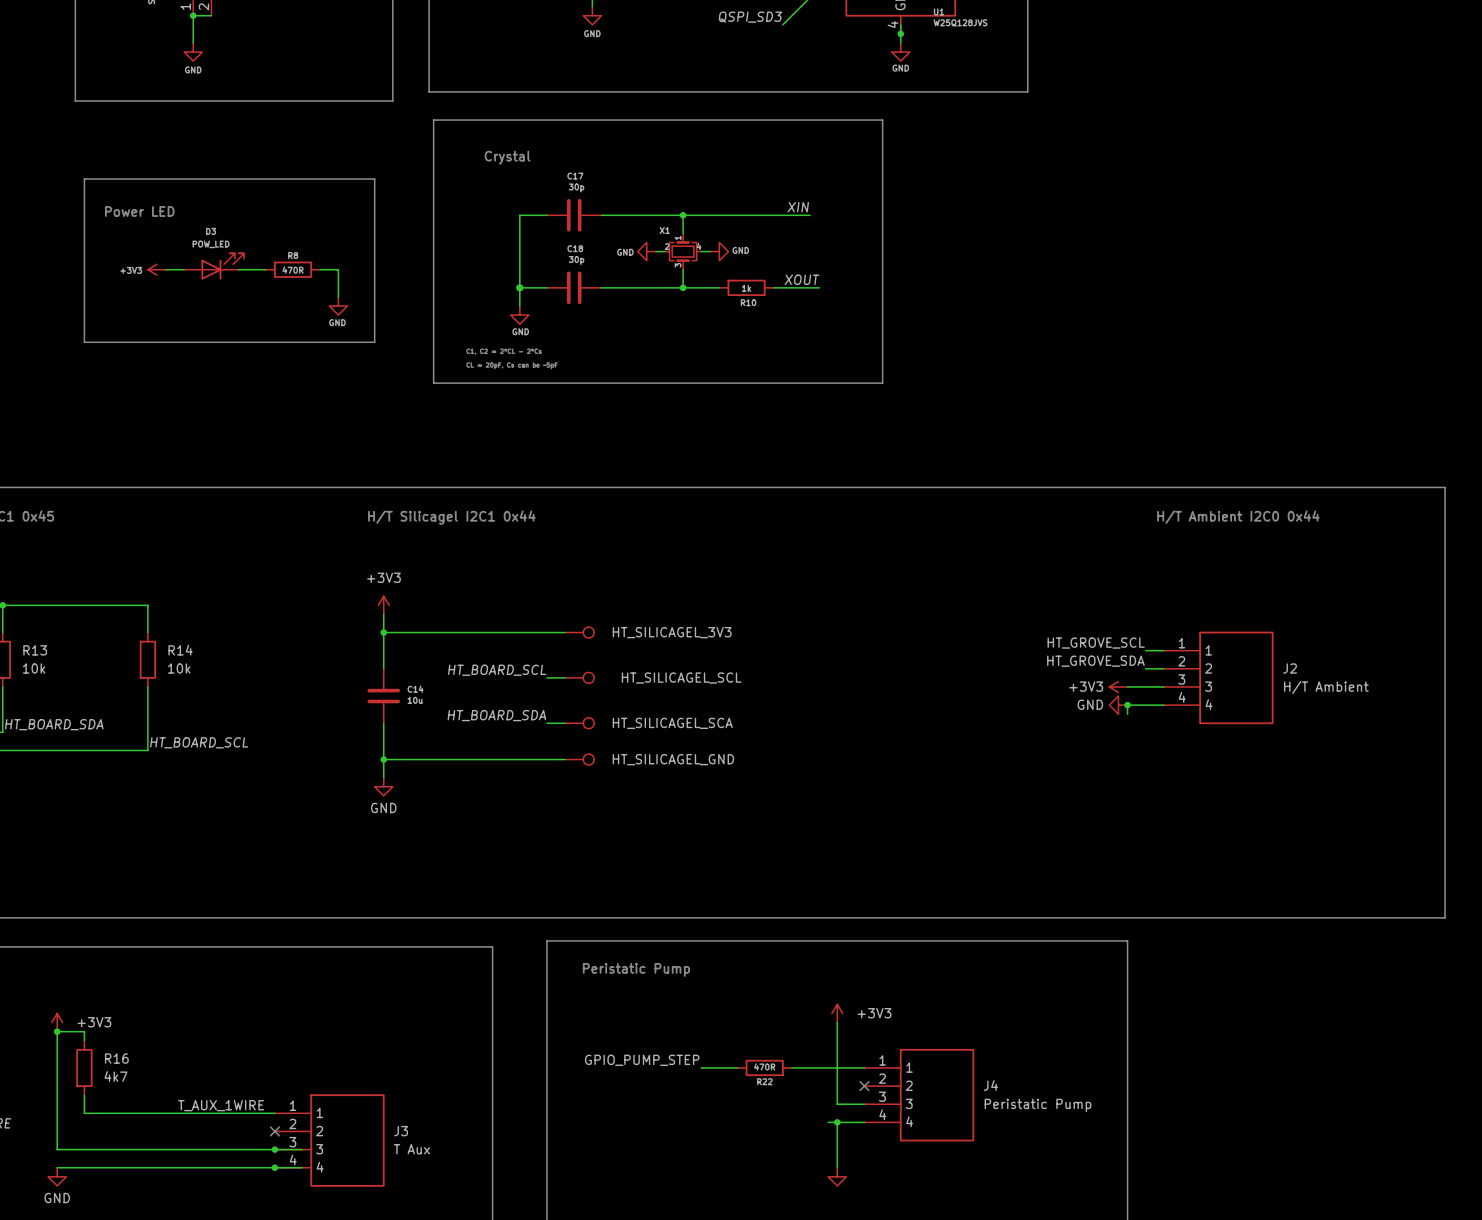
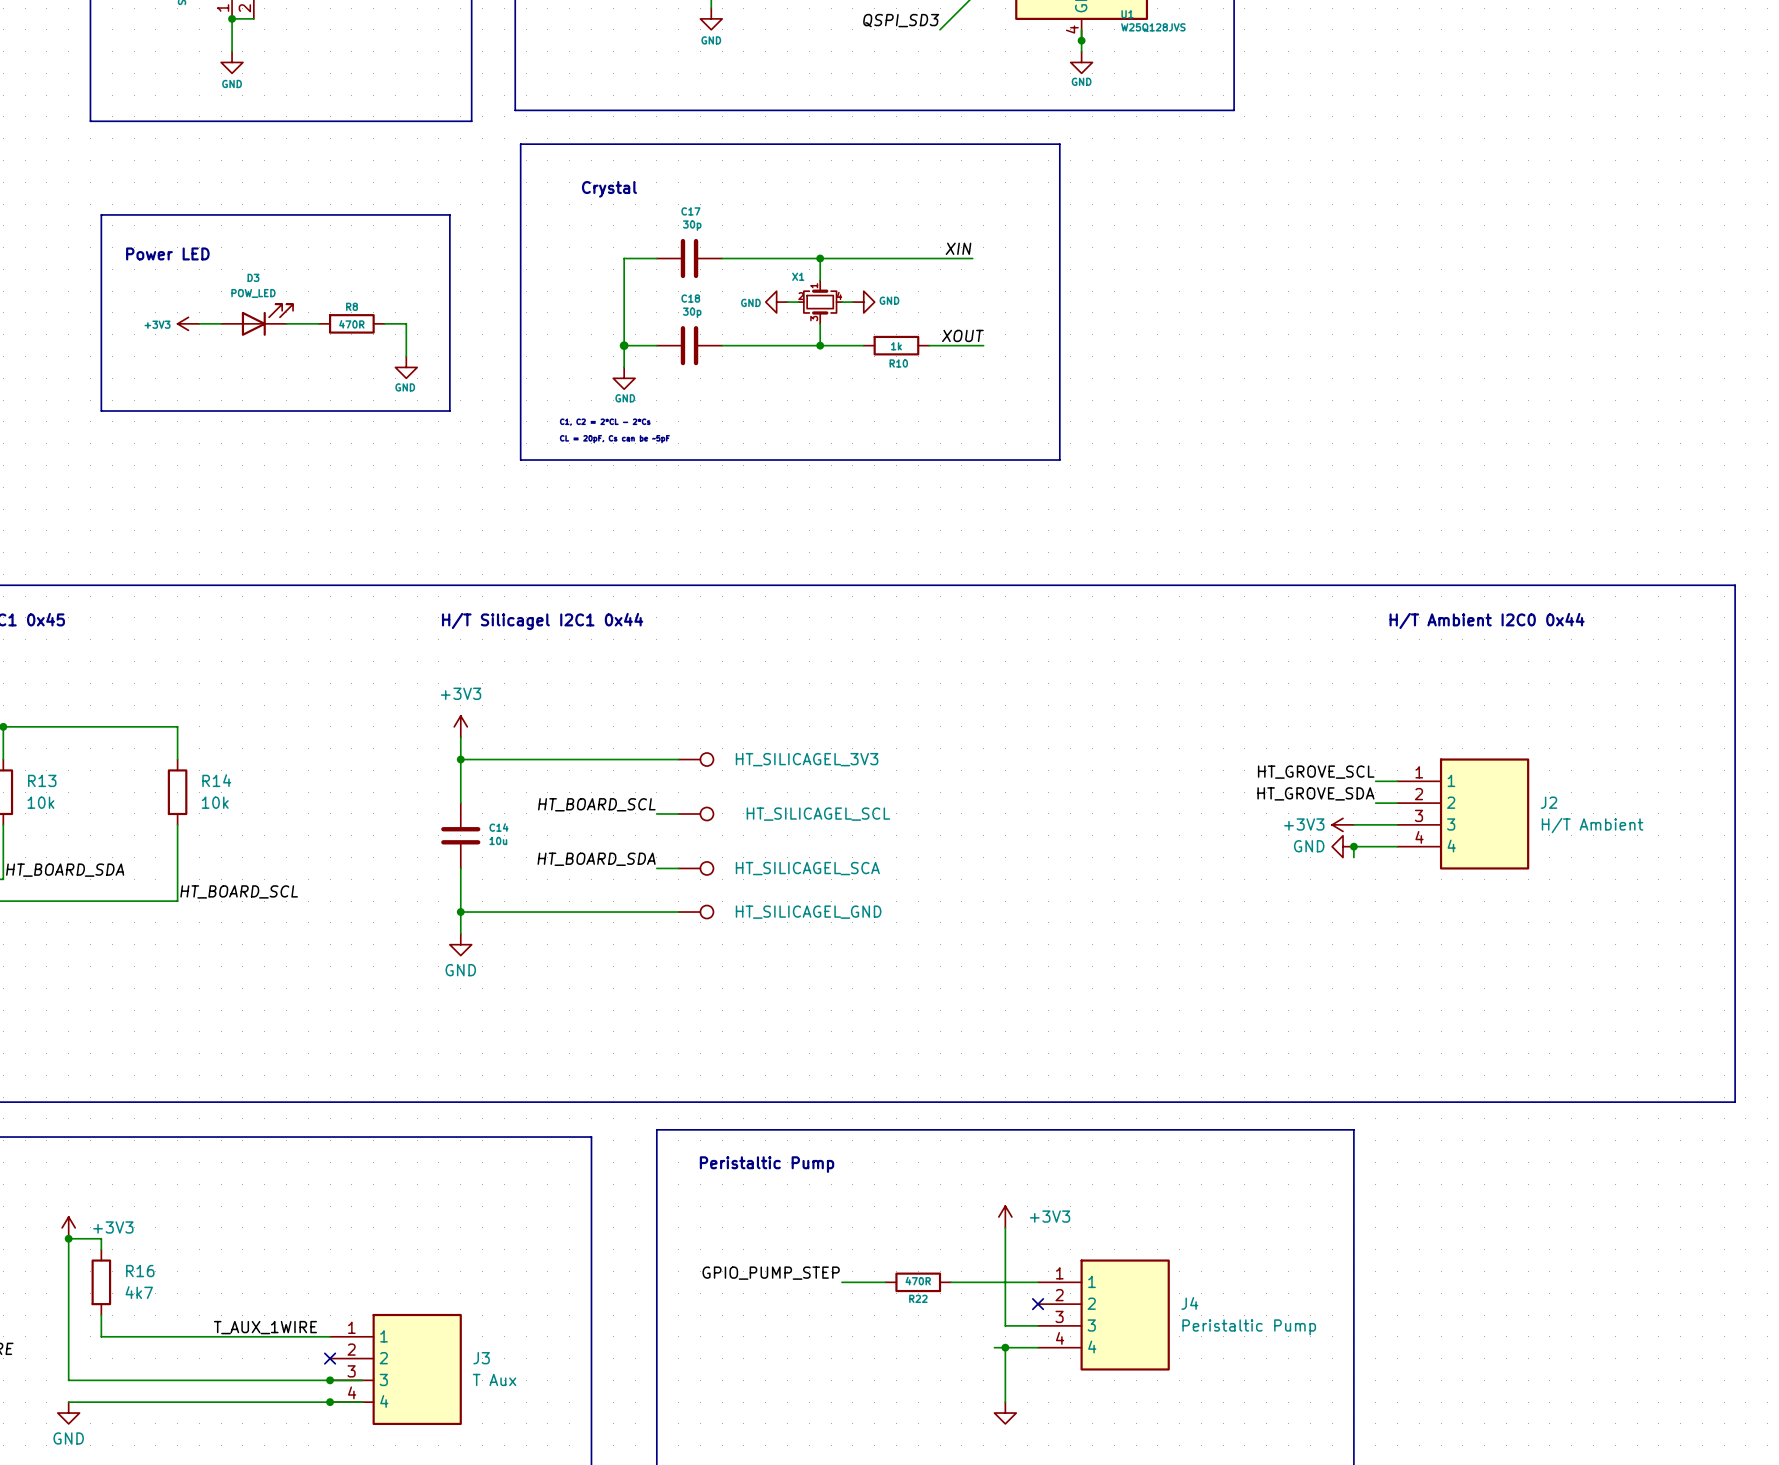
text: Peristatic Pump (636, 969) -> Peristaltic Pump (767, 1164)
J4 value: Peristatic Pump (1037, 1105) -> Peristaltic Pump (1249, 1327)

